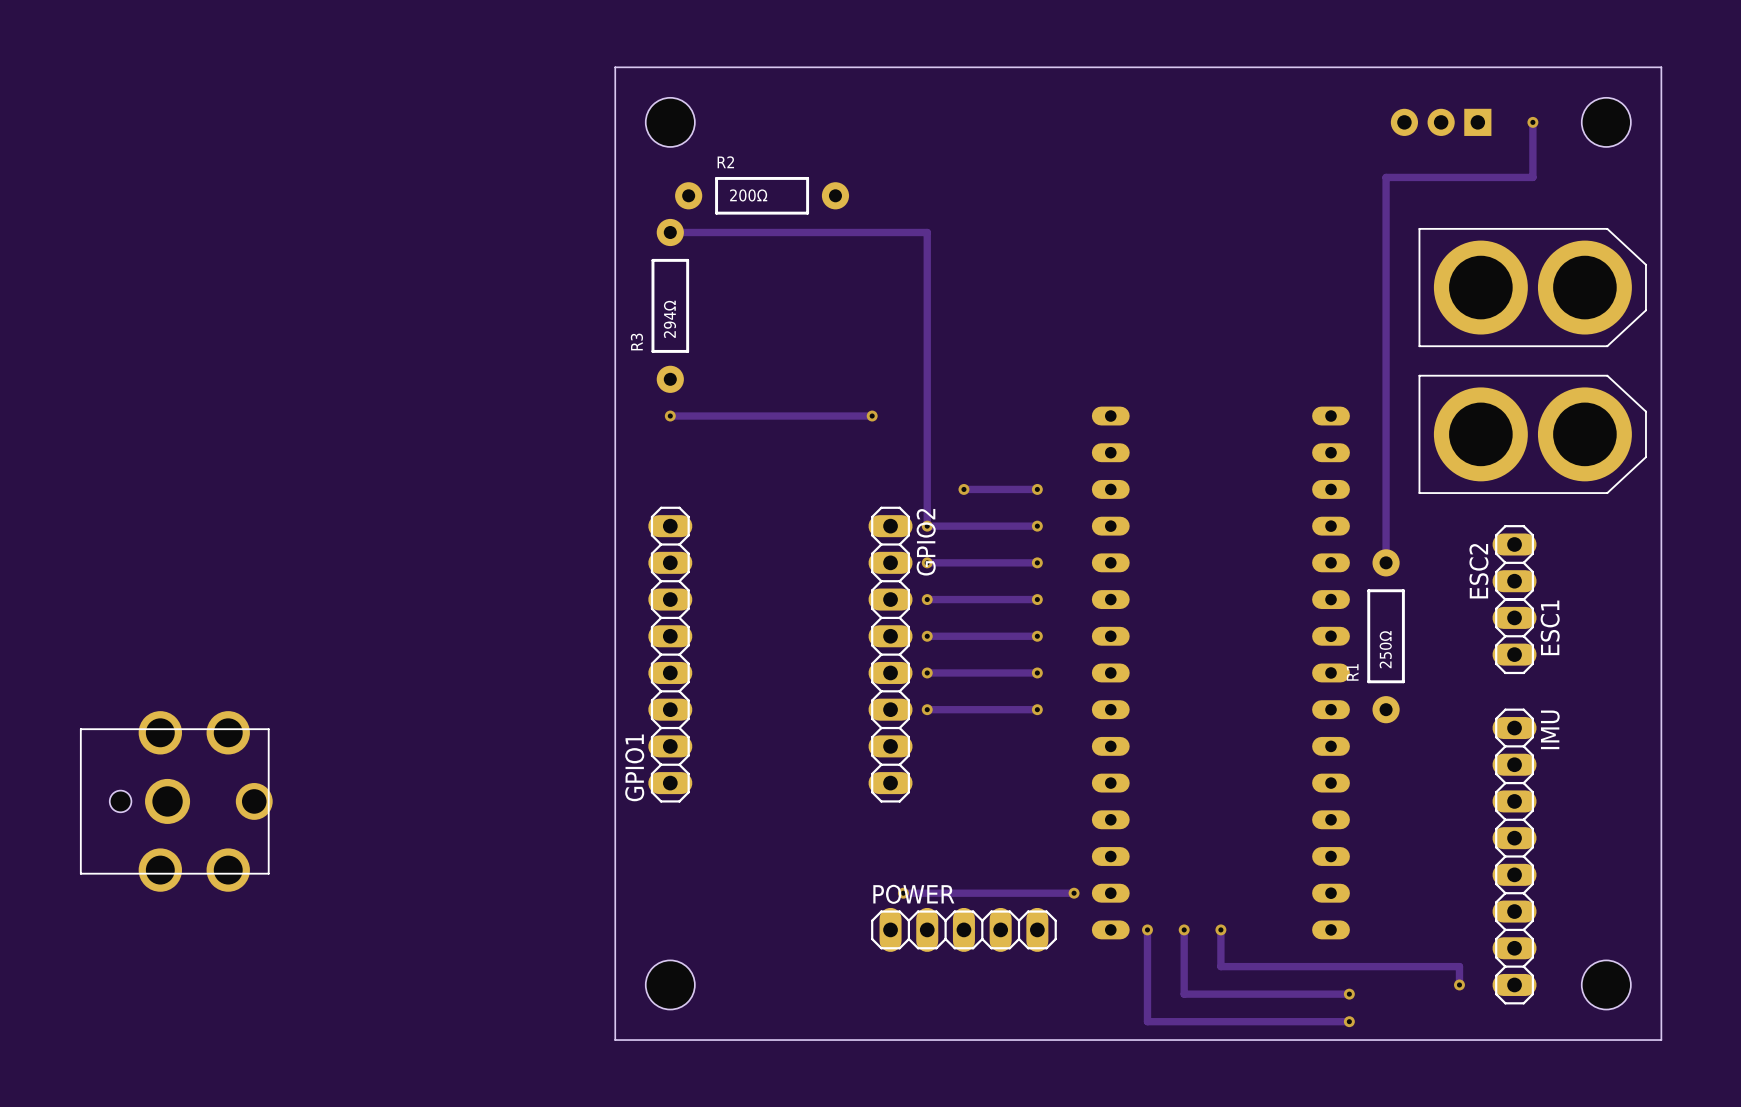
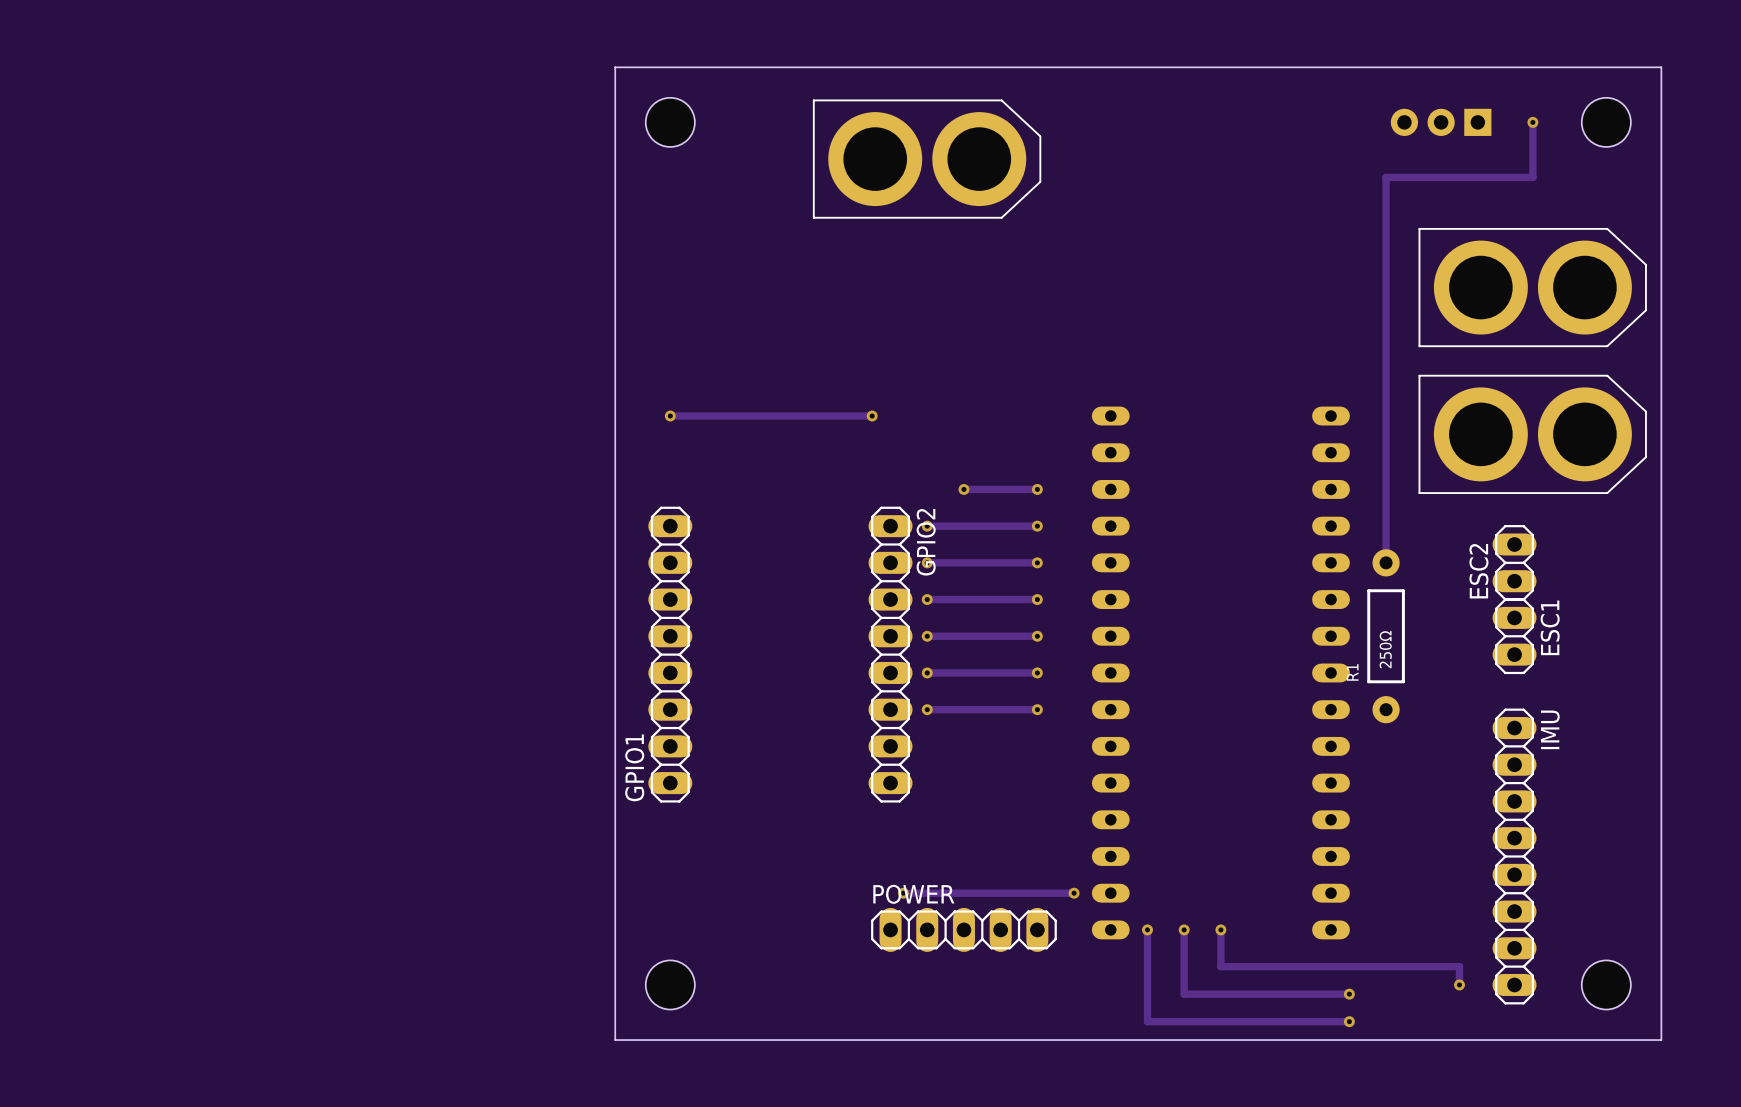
part: none -> (927, 159)
R2: 200Ω (762, 195) -> none
track: (670, 232) (927, 232) (927, 526) -> none
R3: 294Ω (670, 305) -> none
part: (176, 801) -> none

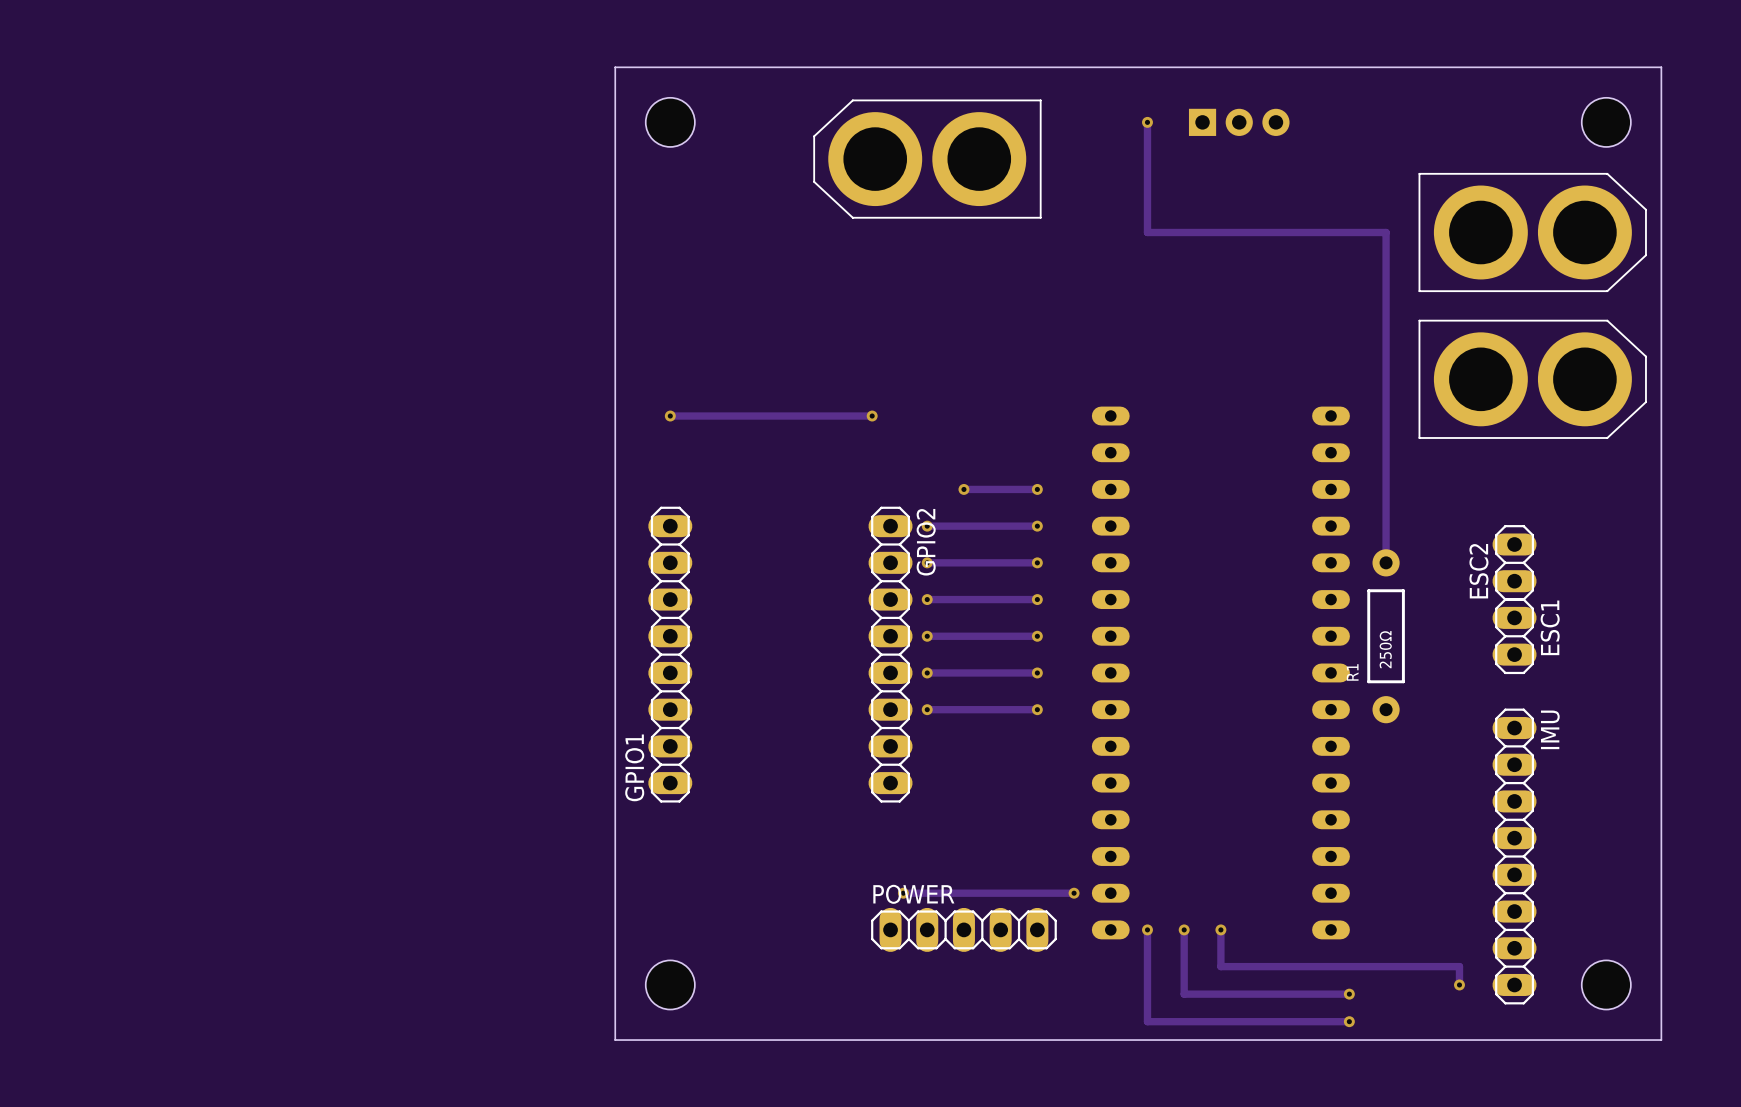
via: none -> (1147, 122)
part rotation: 0° (1441, 122) -> 180° (1239, 122)
part position: (1441, 122) -> (1239, 122)
track: (1532, 122) (1532, 177) (1386, 177) (1386, 232) -> (1147, 122) (1147, 232) (1386, 232)
via: (1532, 122) -> none
part rotation: 0° (927, 159) -> 180° (927, 159)
part: none -> (1532, 232)
part: (1532, 287) -> none
part: none -> (1532, 379)
part: (1532, 434) -> none

